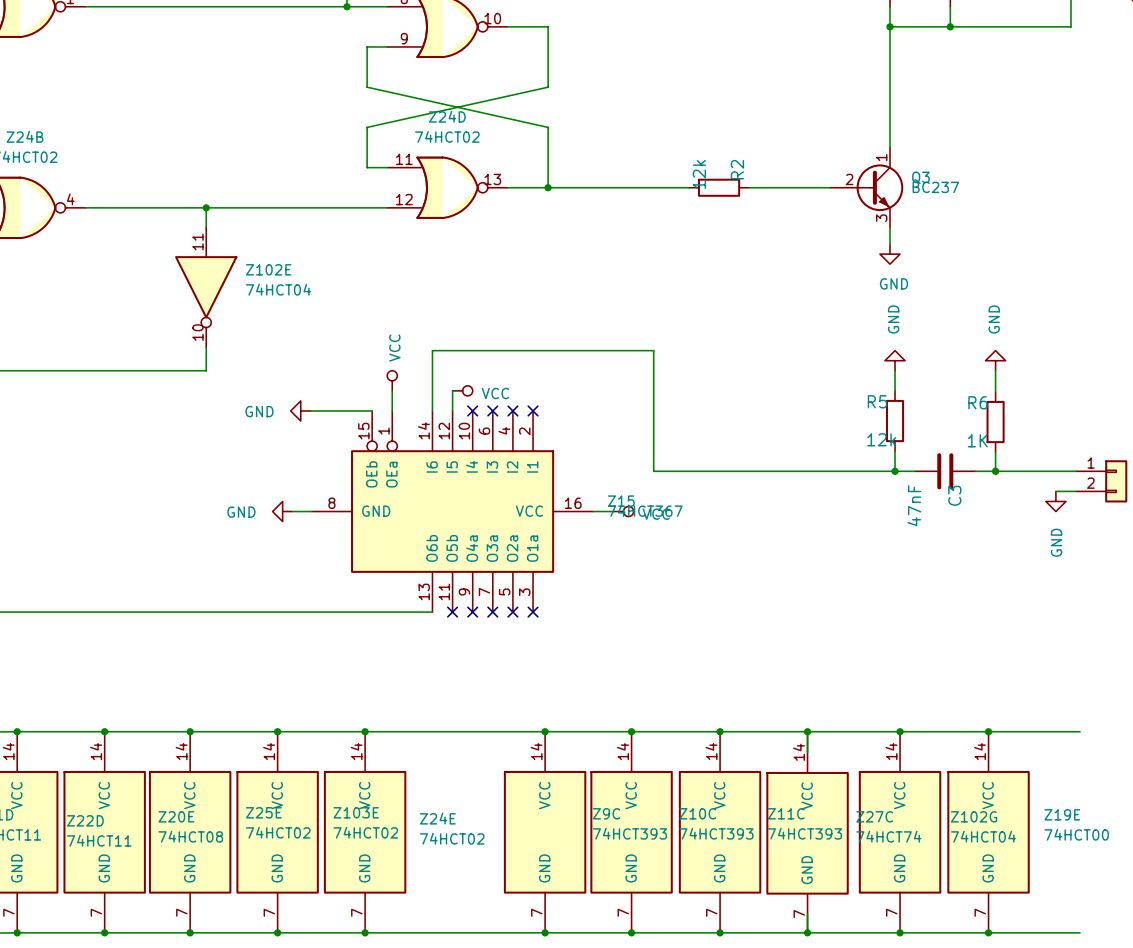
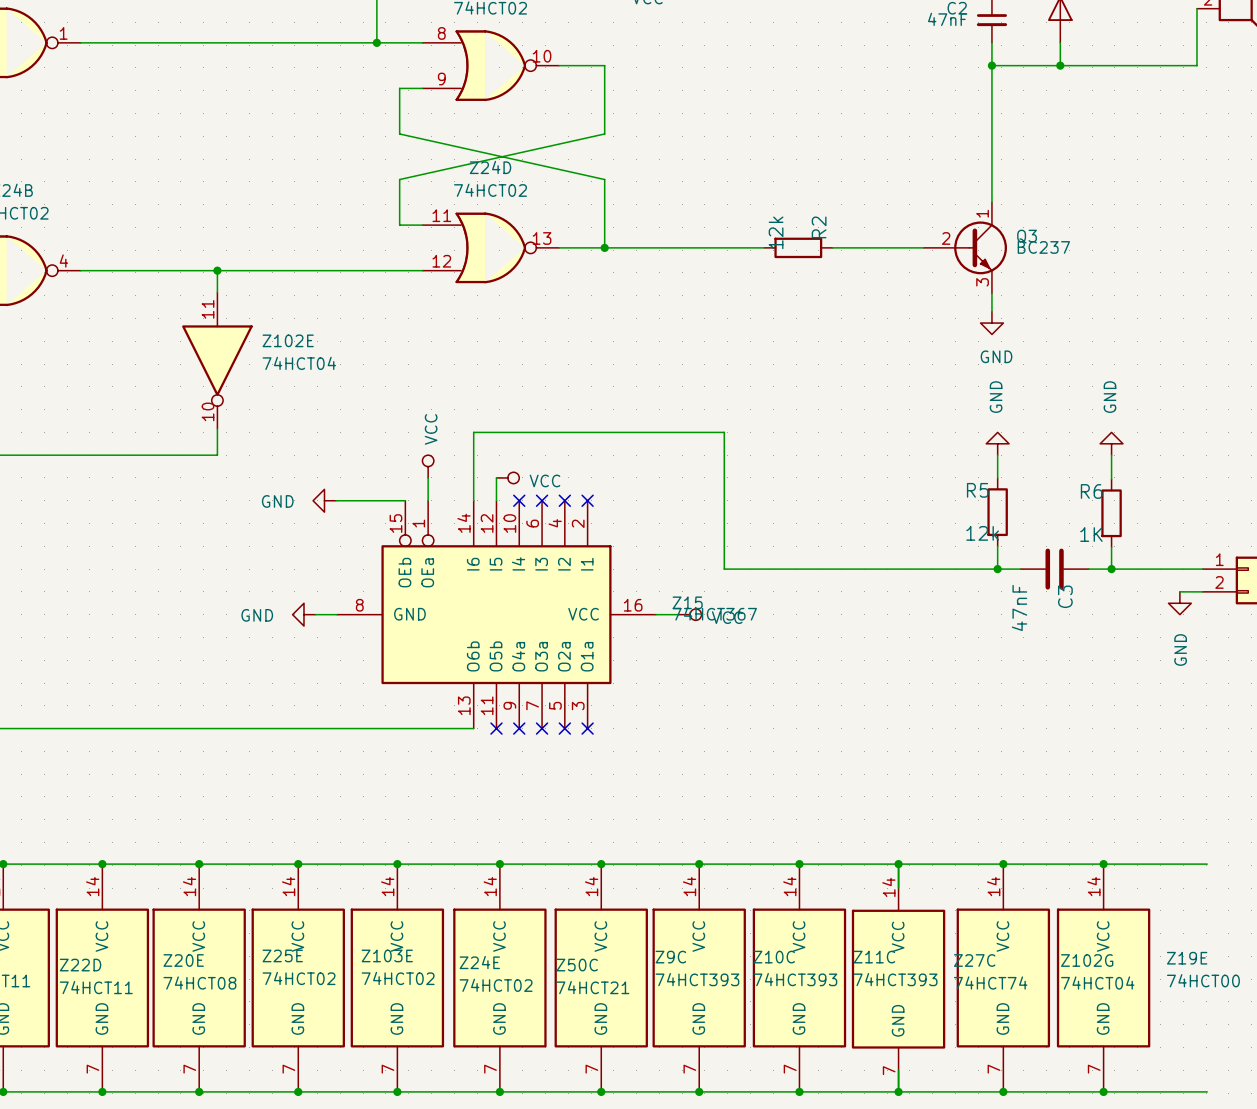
junction: none -> (499, 864)
Z50C: none -> 74HCT21 (499, 978)
junction: none -> (499, 1091)

